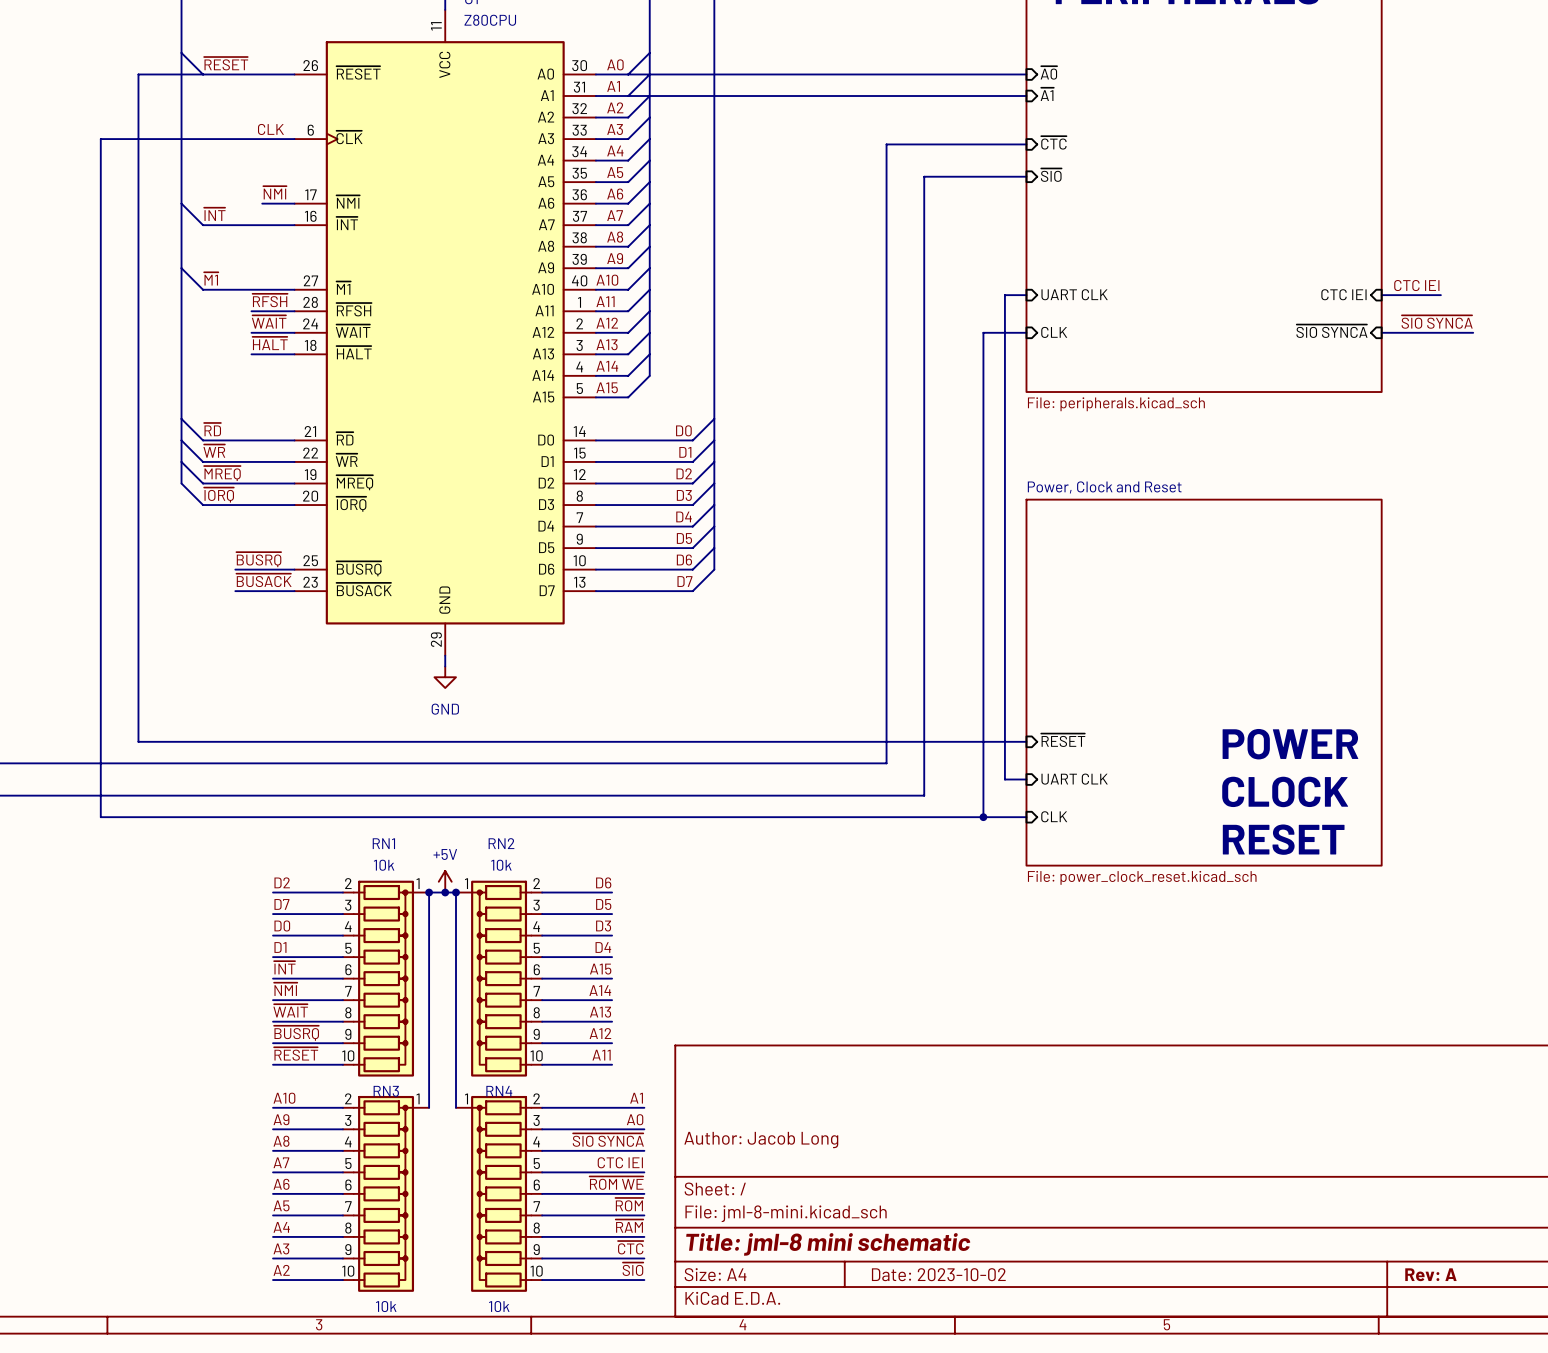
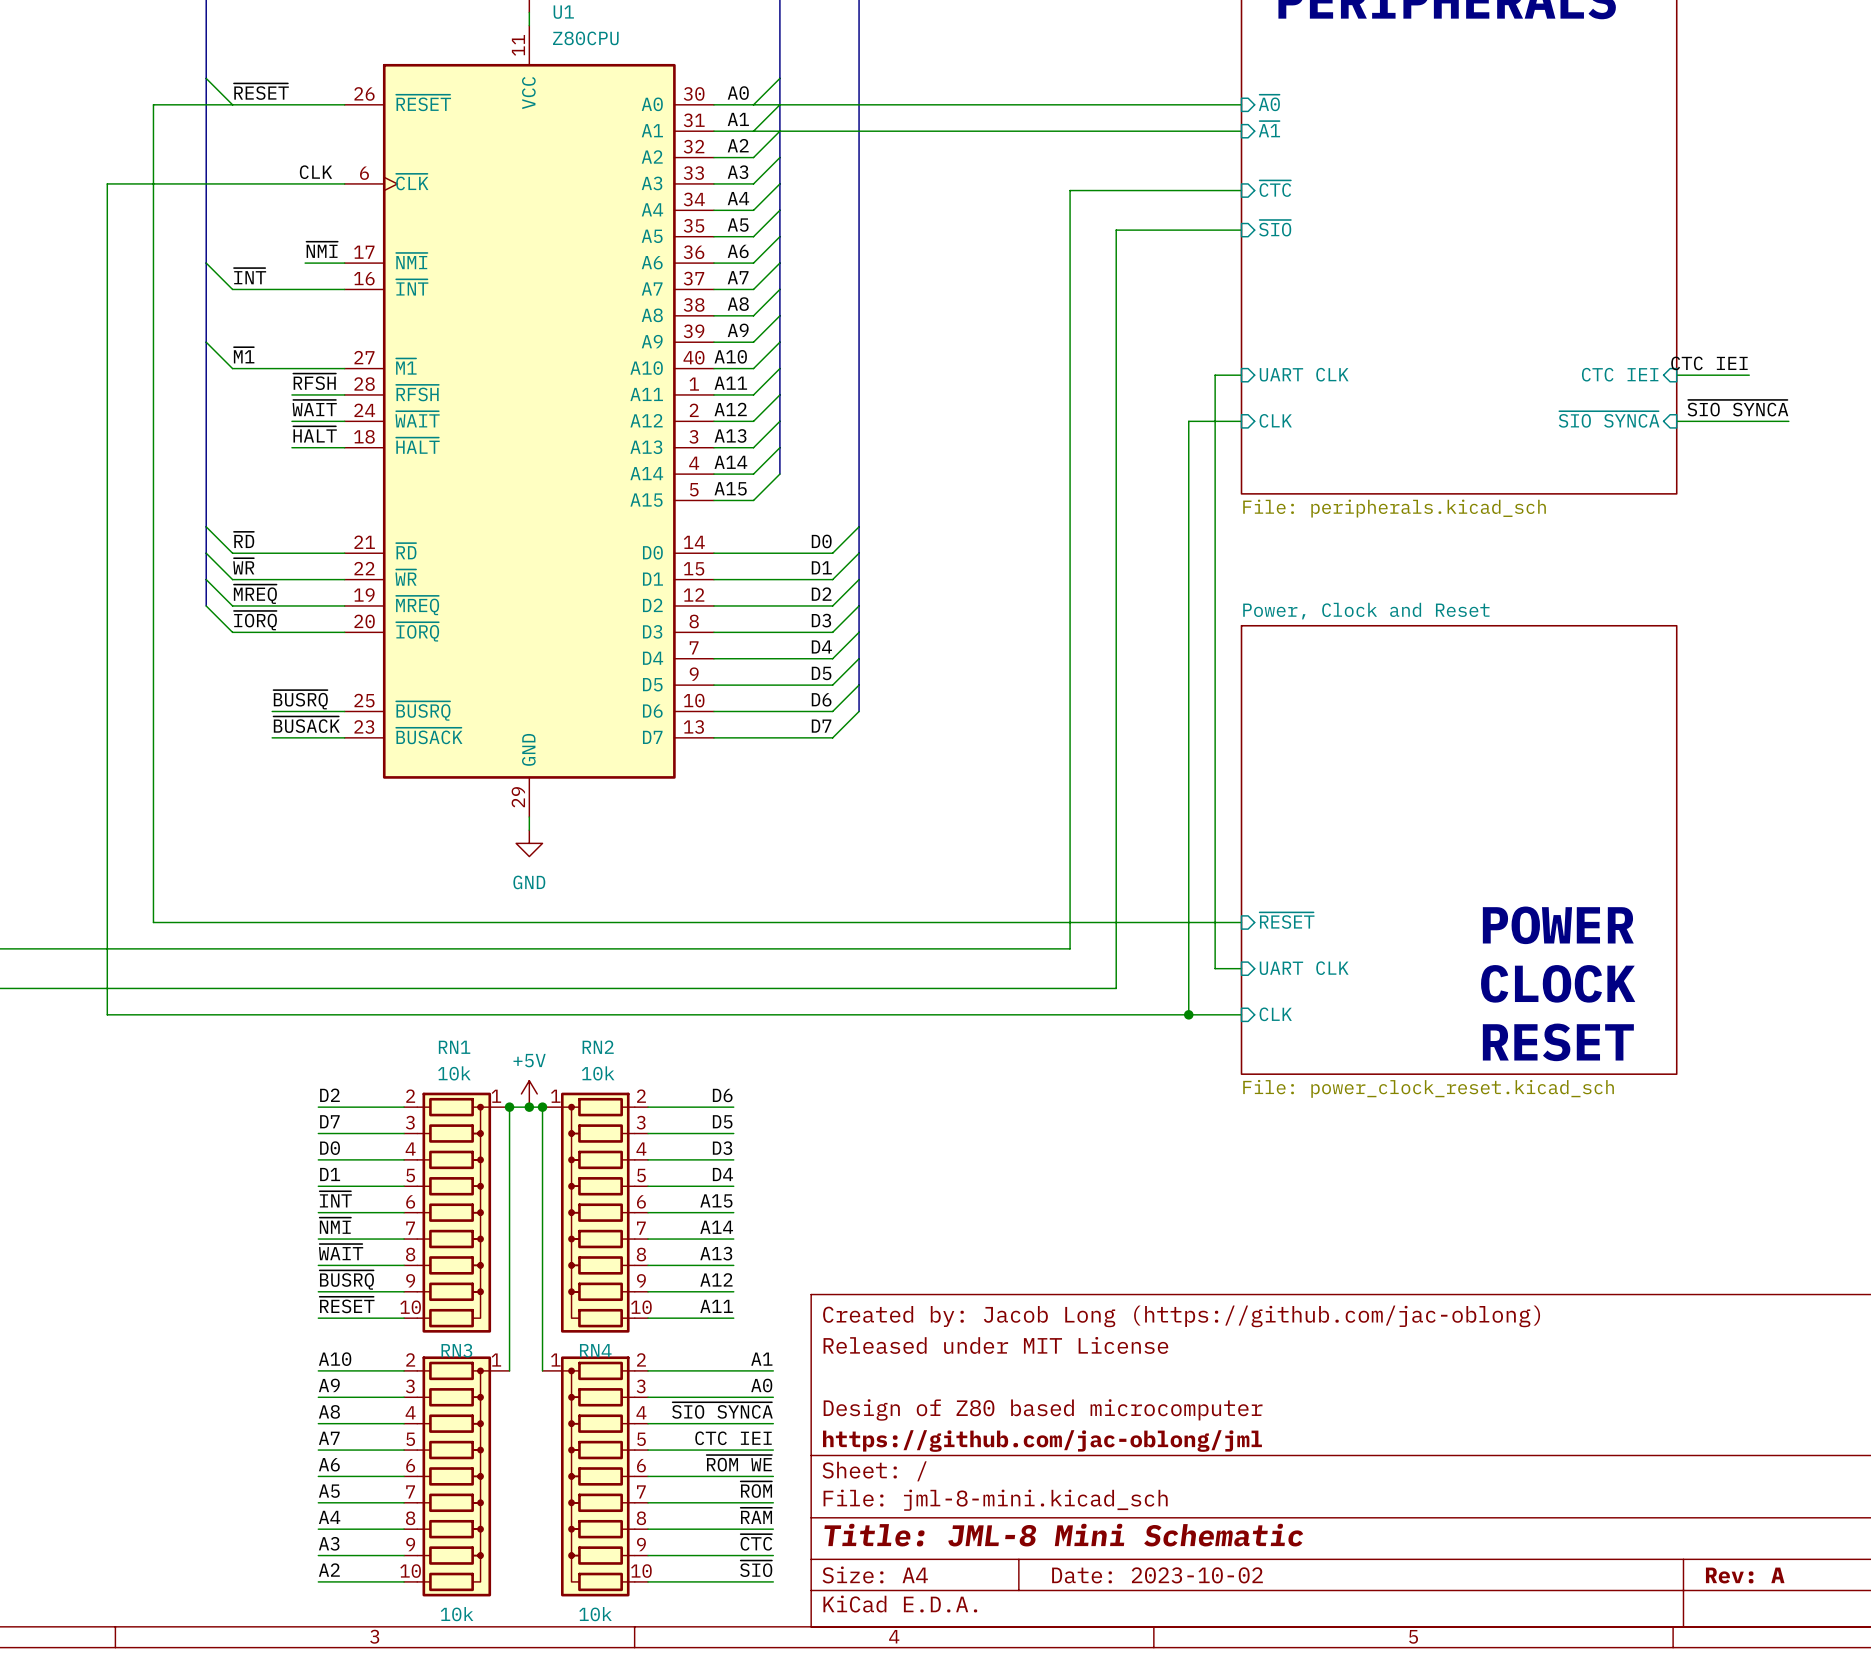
title block: none -> Created by: Jacob Long (https://github.com/jac-oblong) (1181, 1316)
title block: none -> Released under MIT License (995, 1345)
title block: Author: Jacob Long (761, 1140) -> Design of Z80 based microcomputer (1043, 1409)
title block: none -> https://github.com/jac-oblong/jml (1042, 1441)
title block: Title: jml-8 mini schematic (828, 1244) -> Title: JML-8 Mini Schematic (1063, 1535)

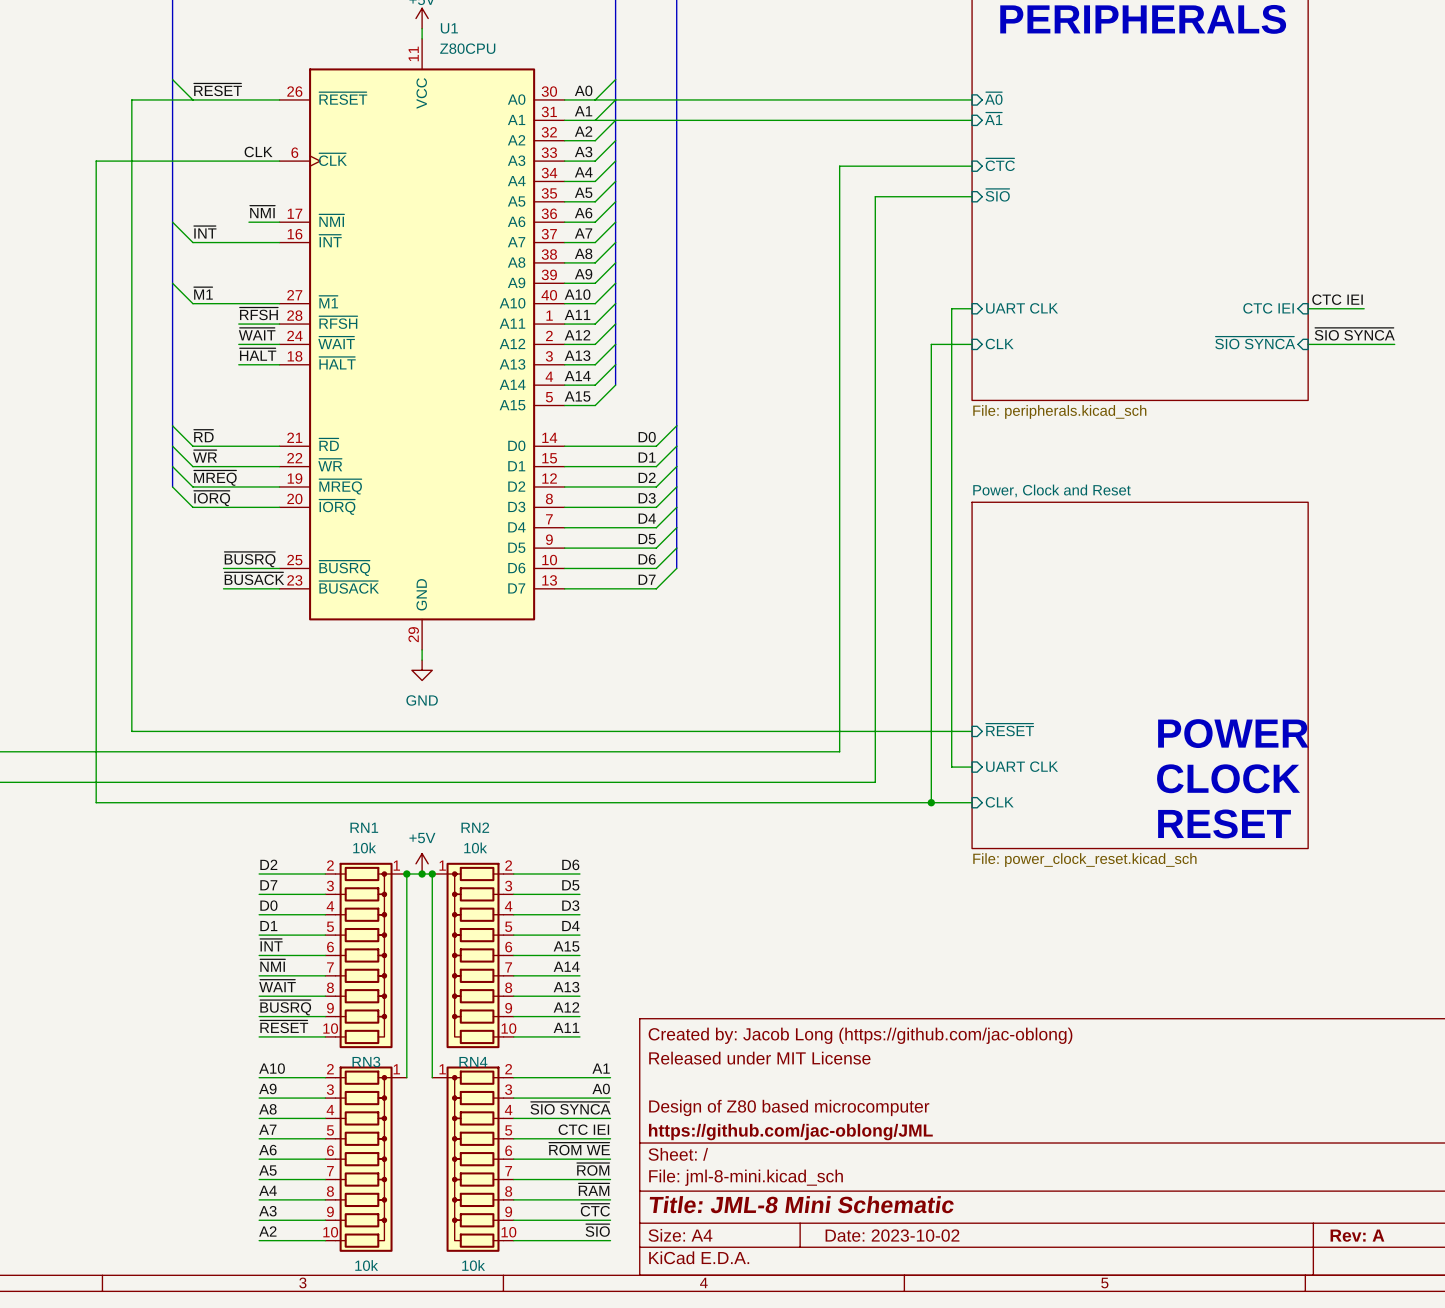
title block: https://github.com/jac-oblong/jml (1042, 1441) -> https://github.com/jac-oblong/JML (790, 1132)

